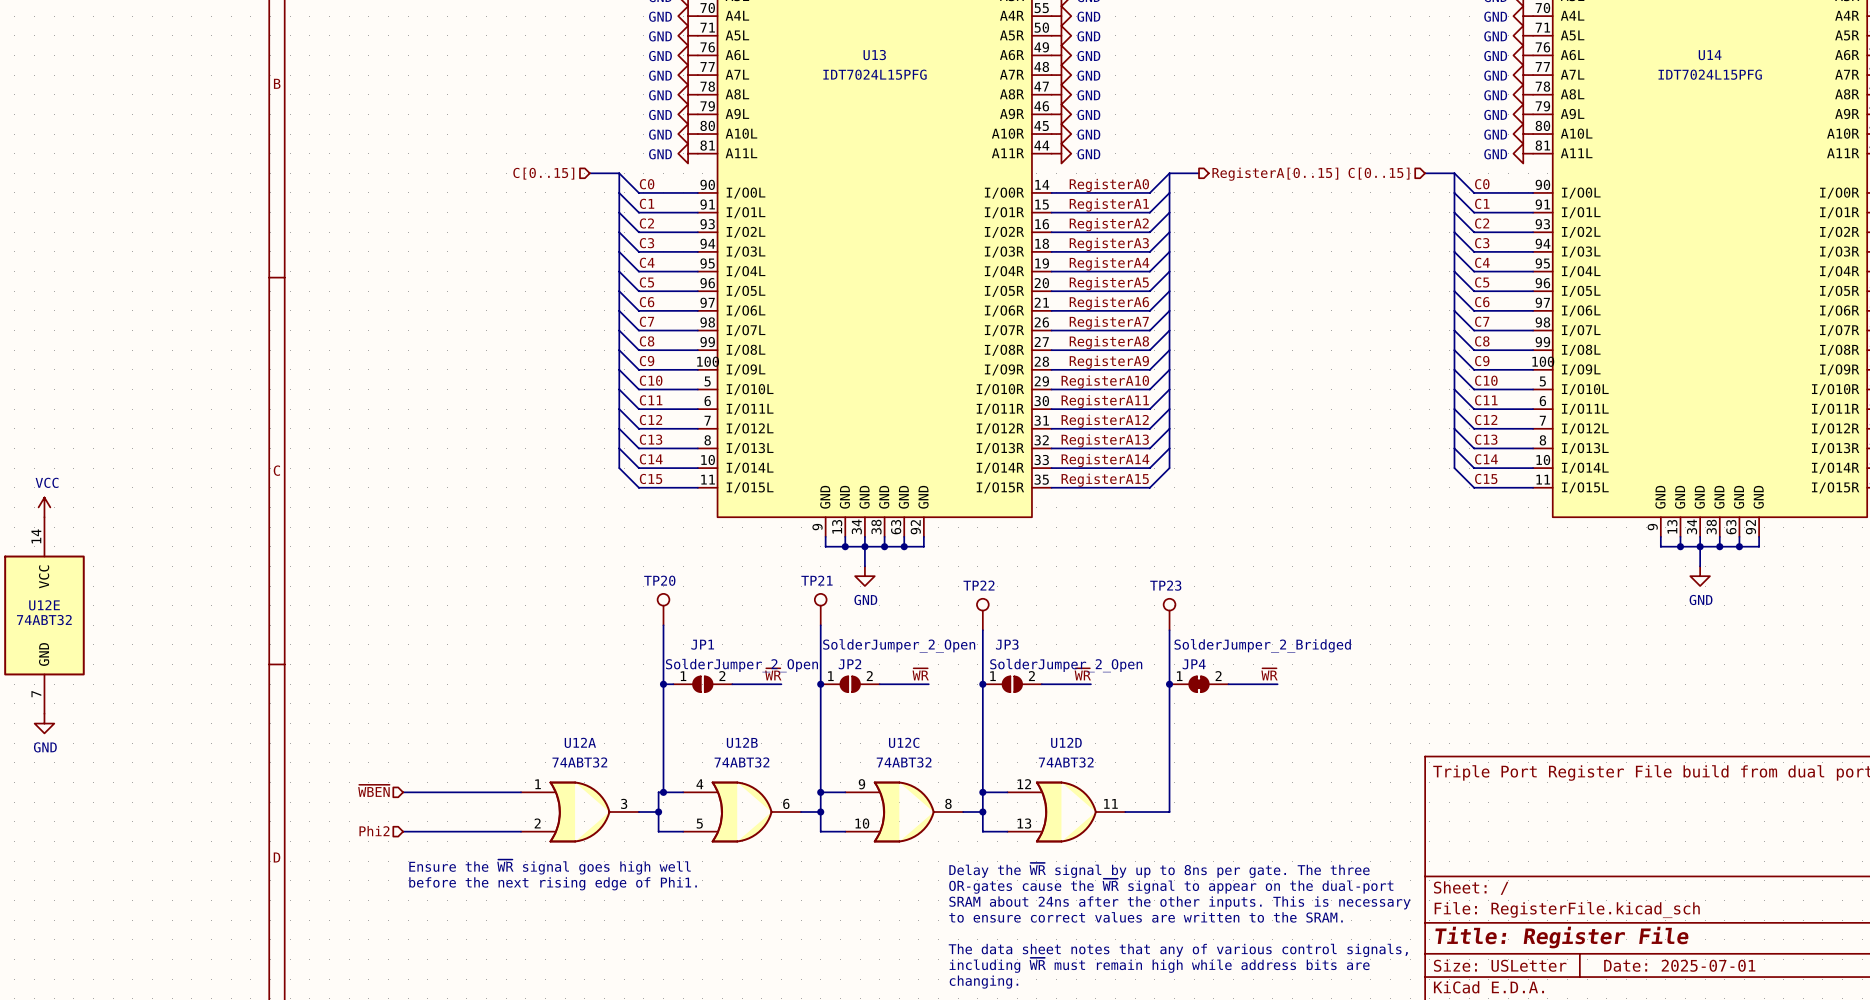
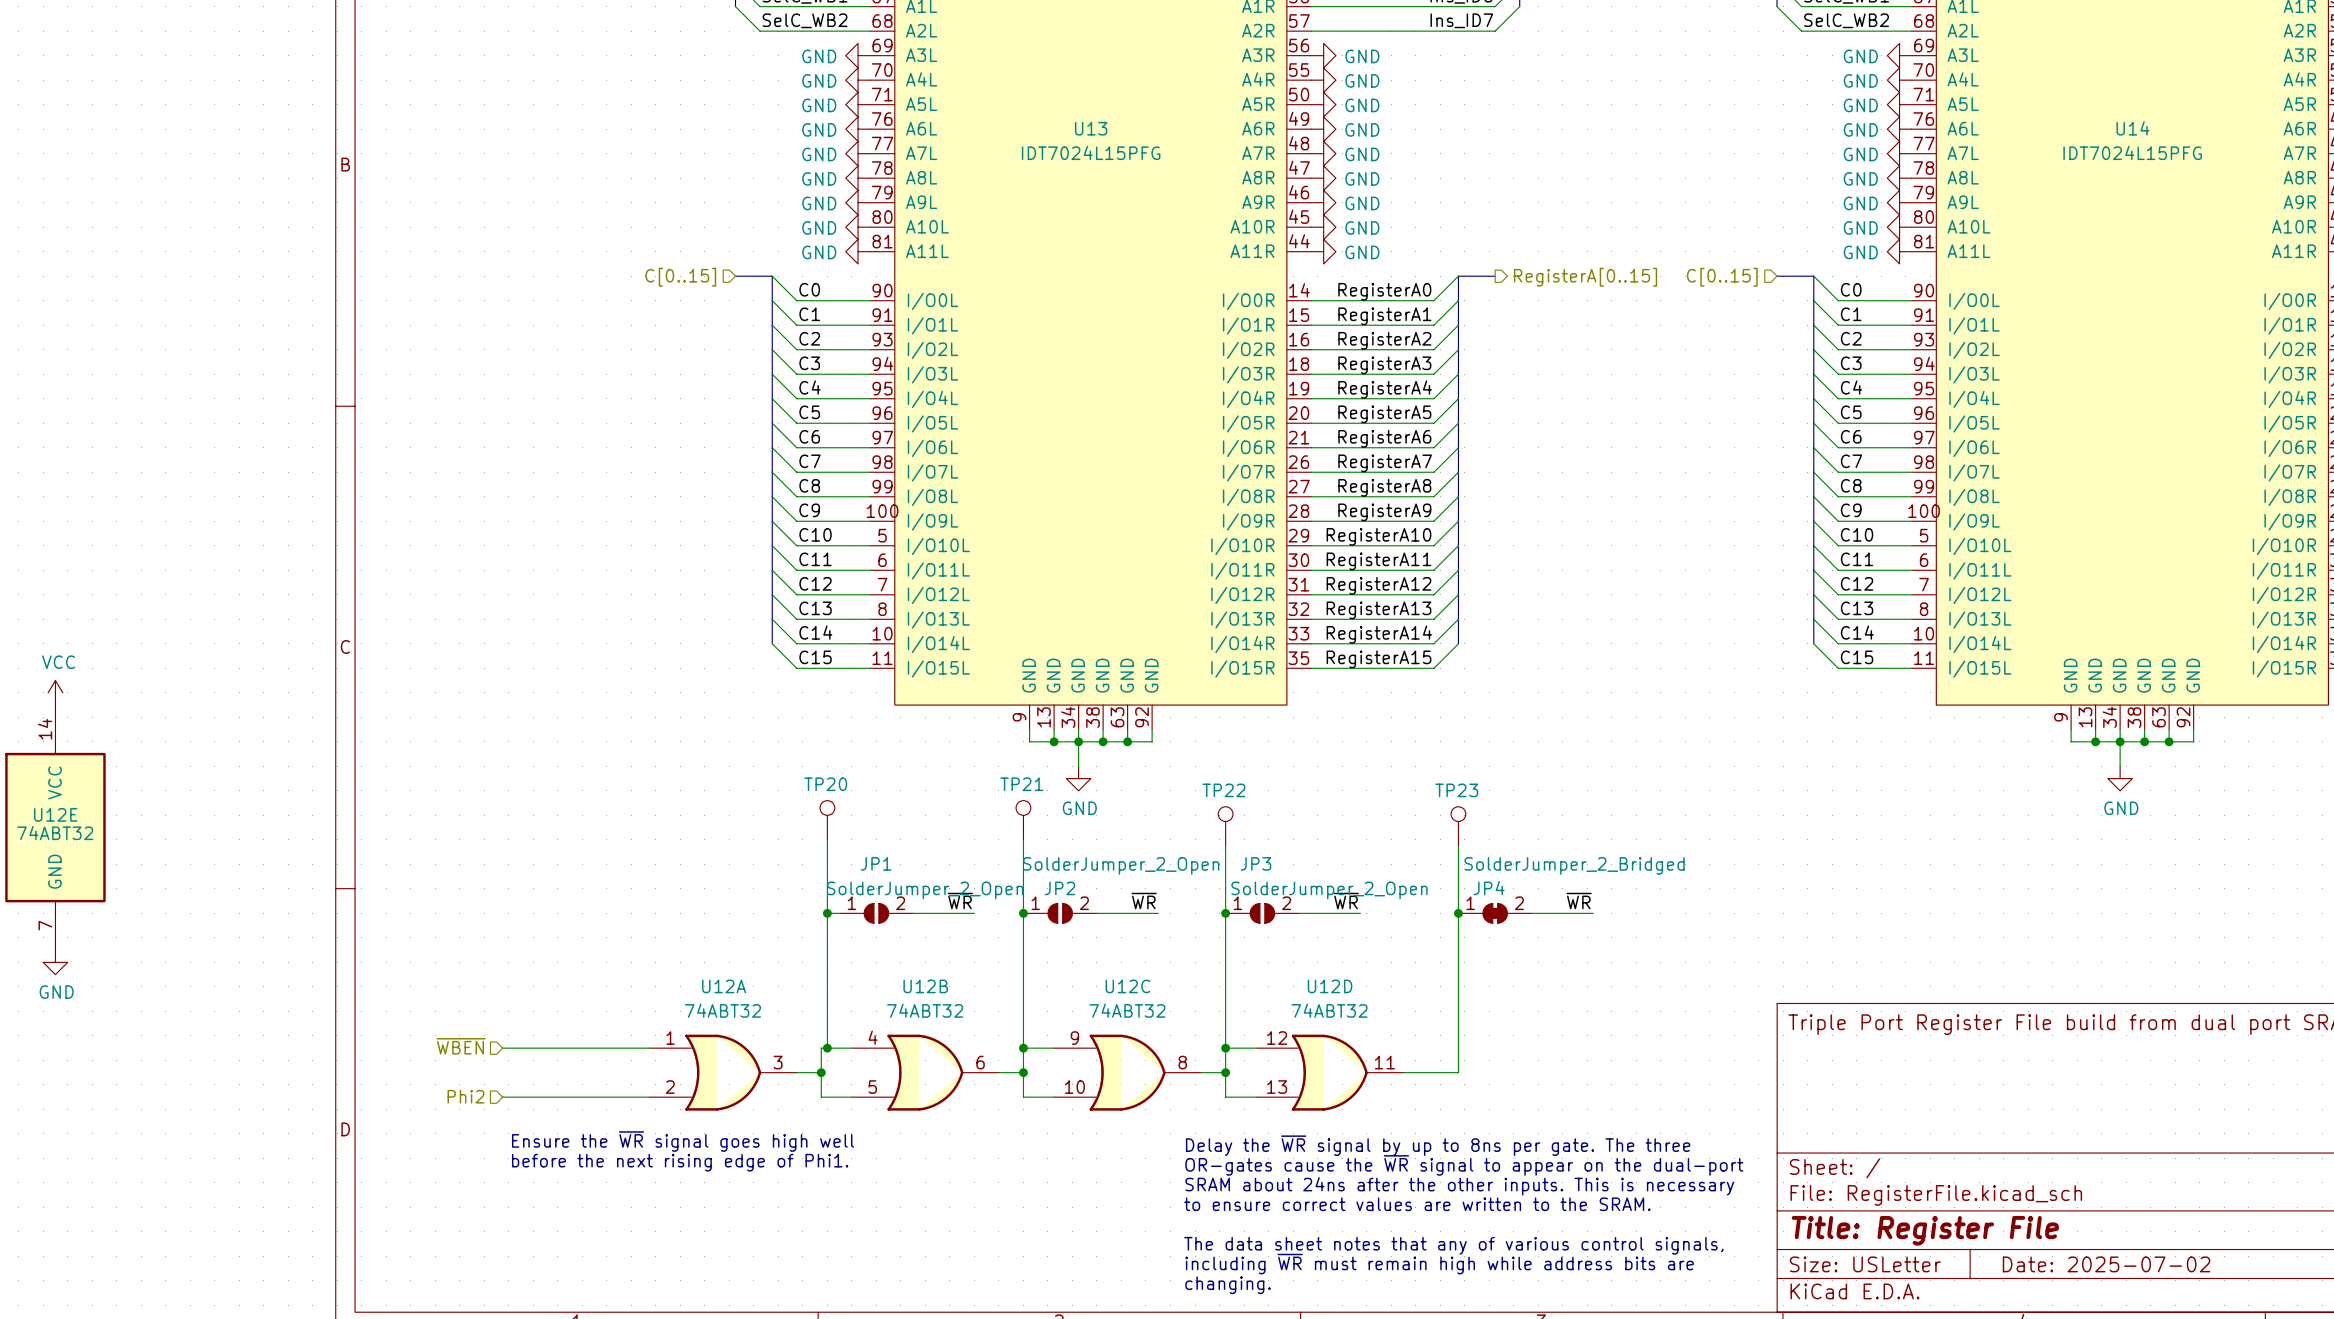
title block: Date: 2025-07-01 (1679, 965) -> Date: 2025-07-02 (2106, 1264)

